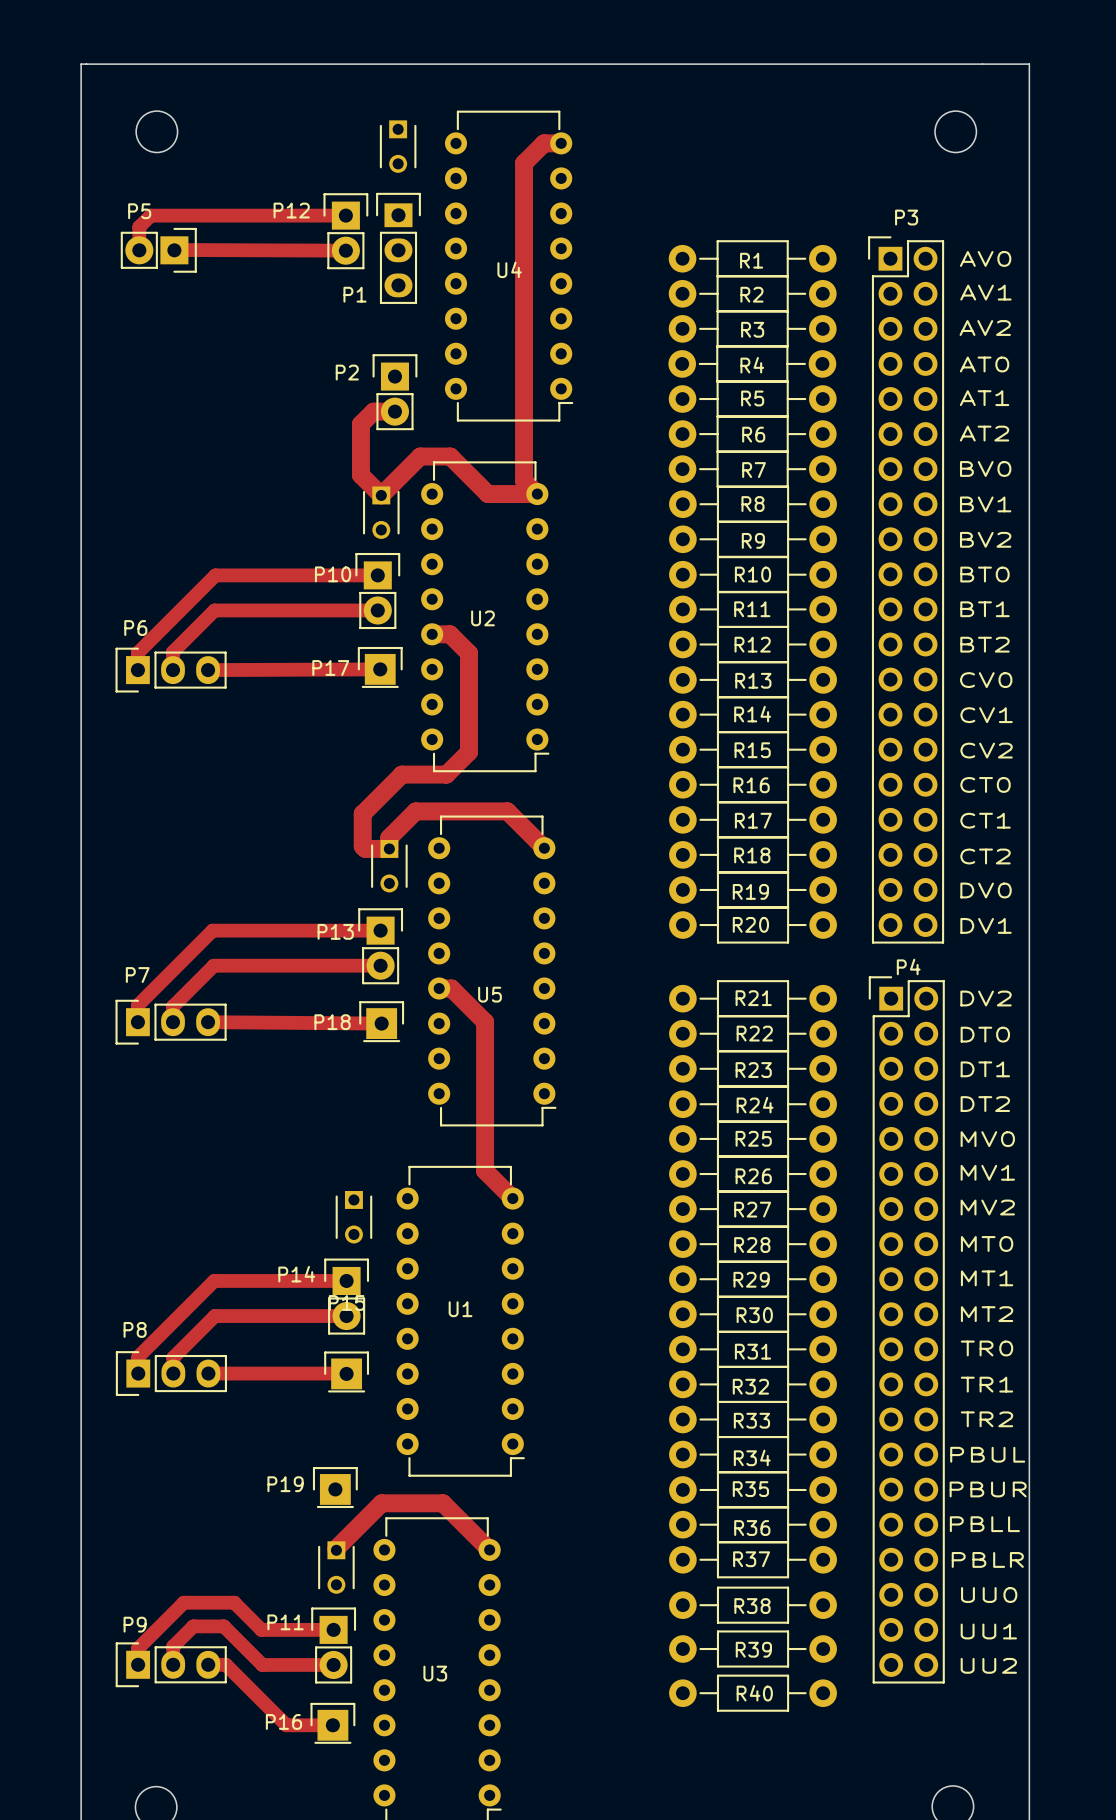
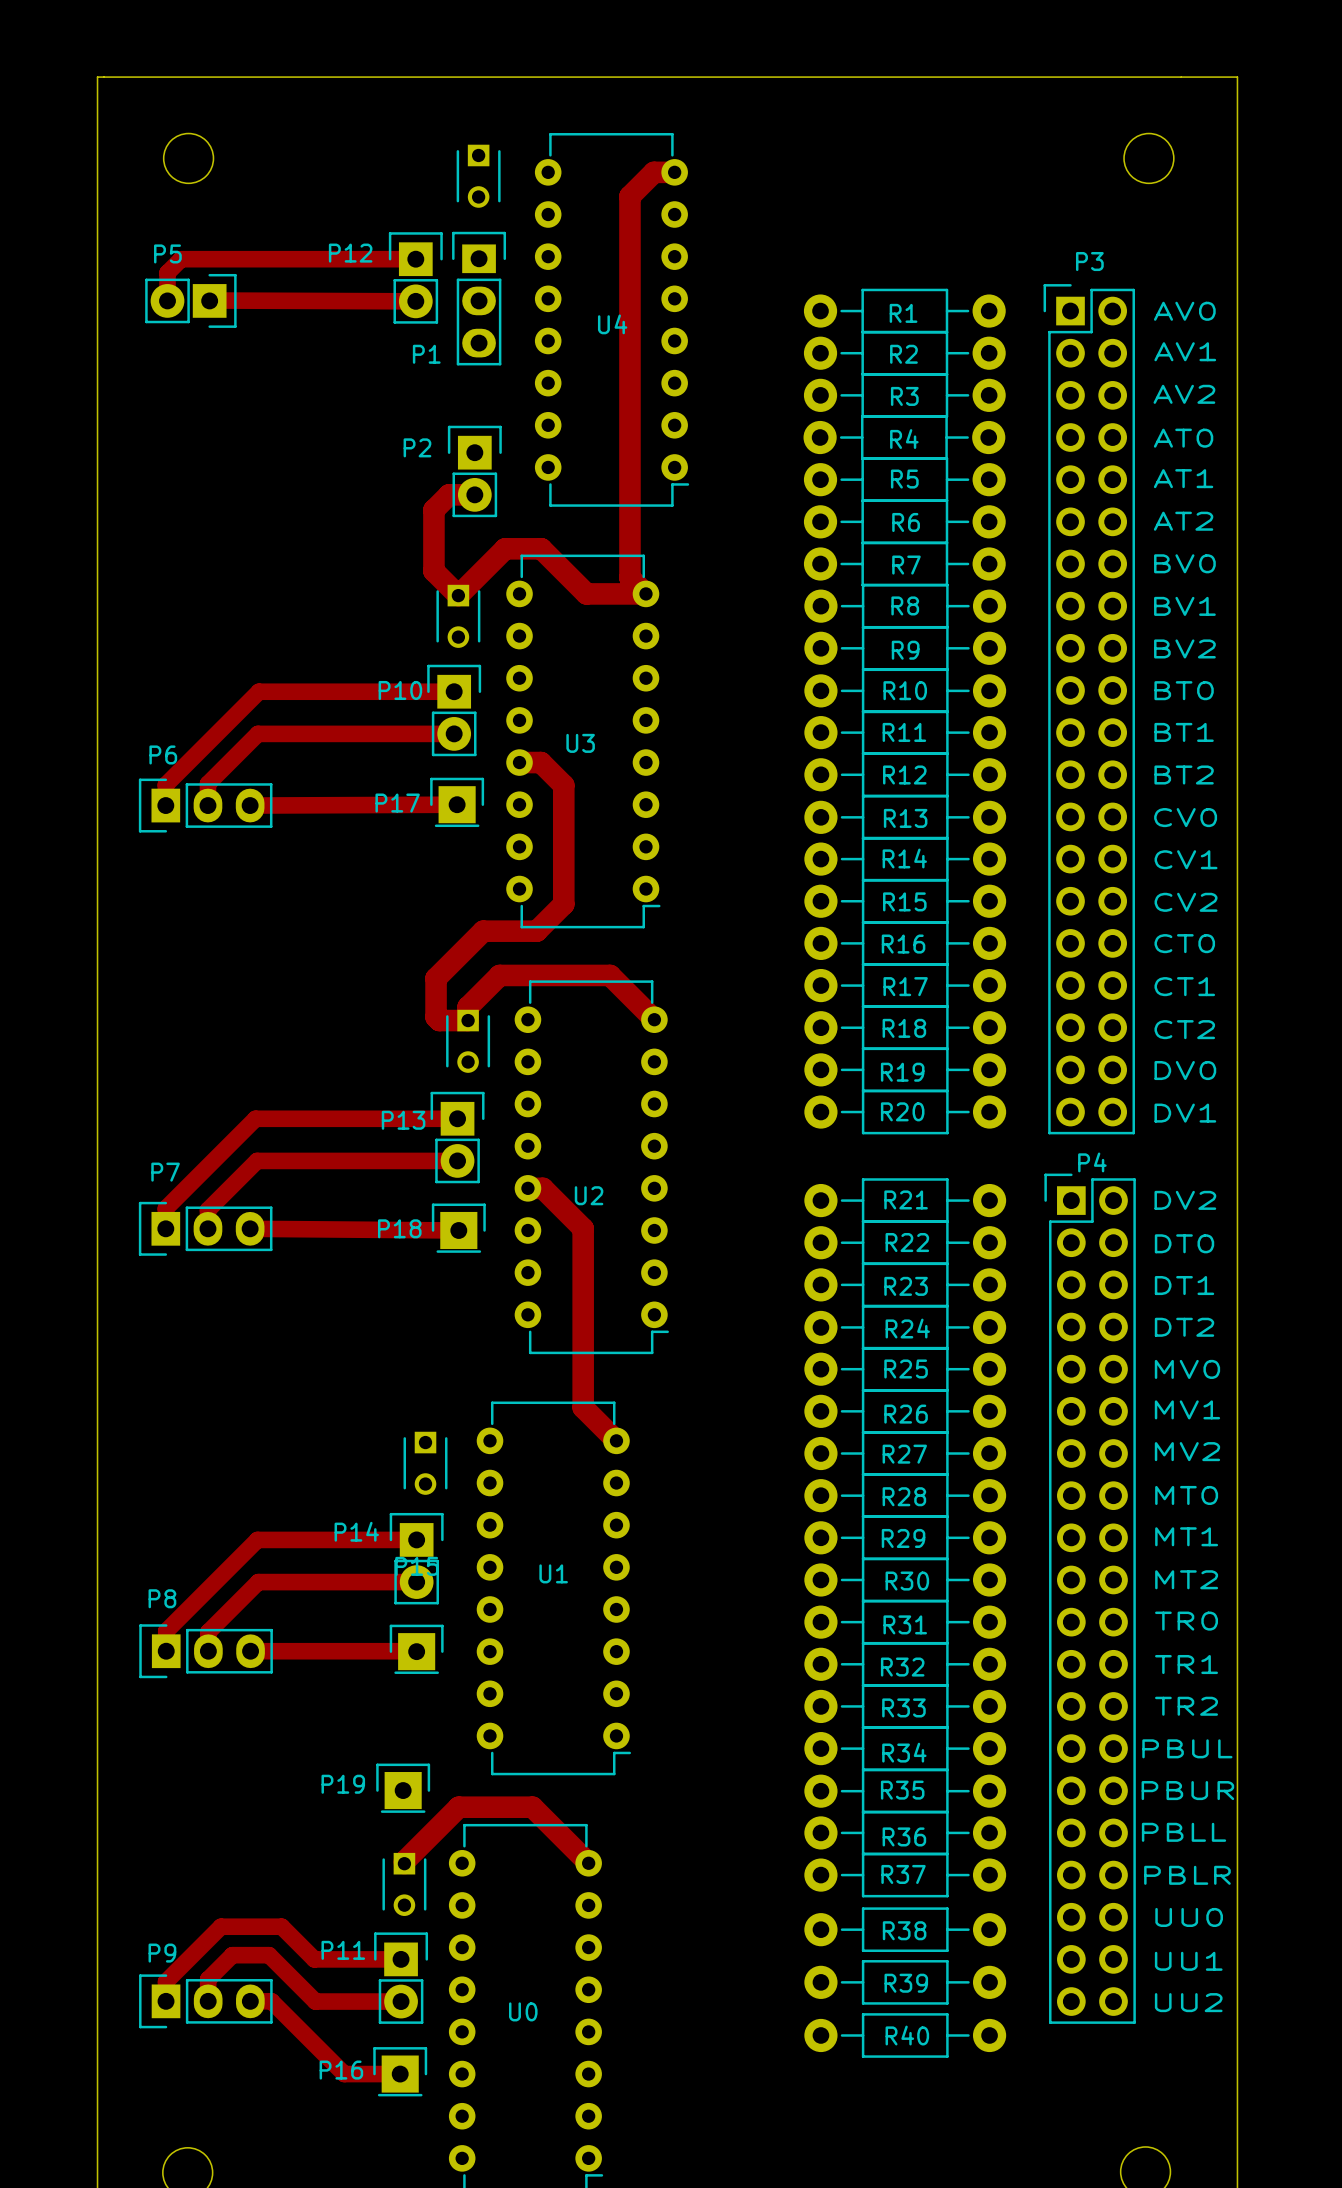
U2 name: U2 (482, 618) -> U3 (580, 743)
U5 name: U5 (489, 994) -> U2 (589, 1195)
U3 name: U3 (435, 1673) -> U0 (523, 2011)

